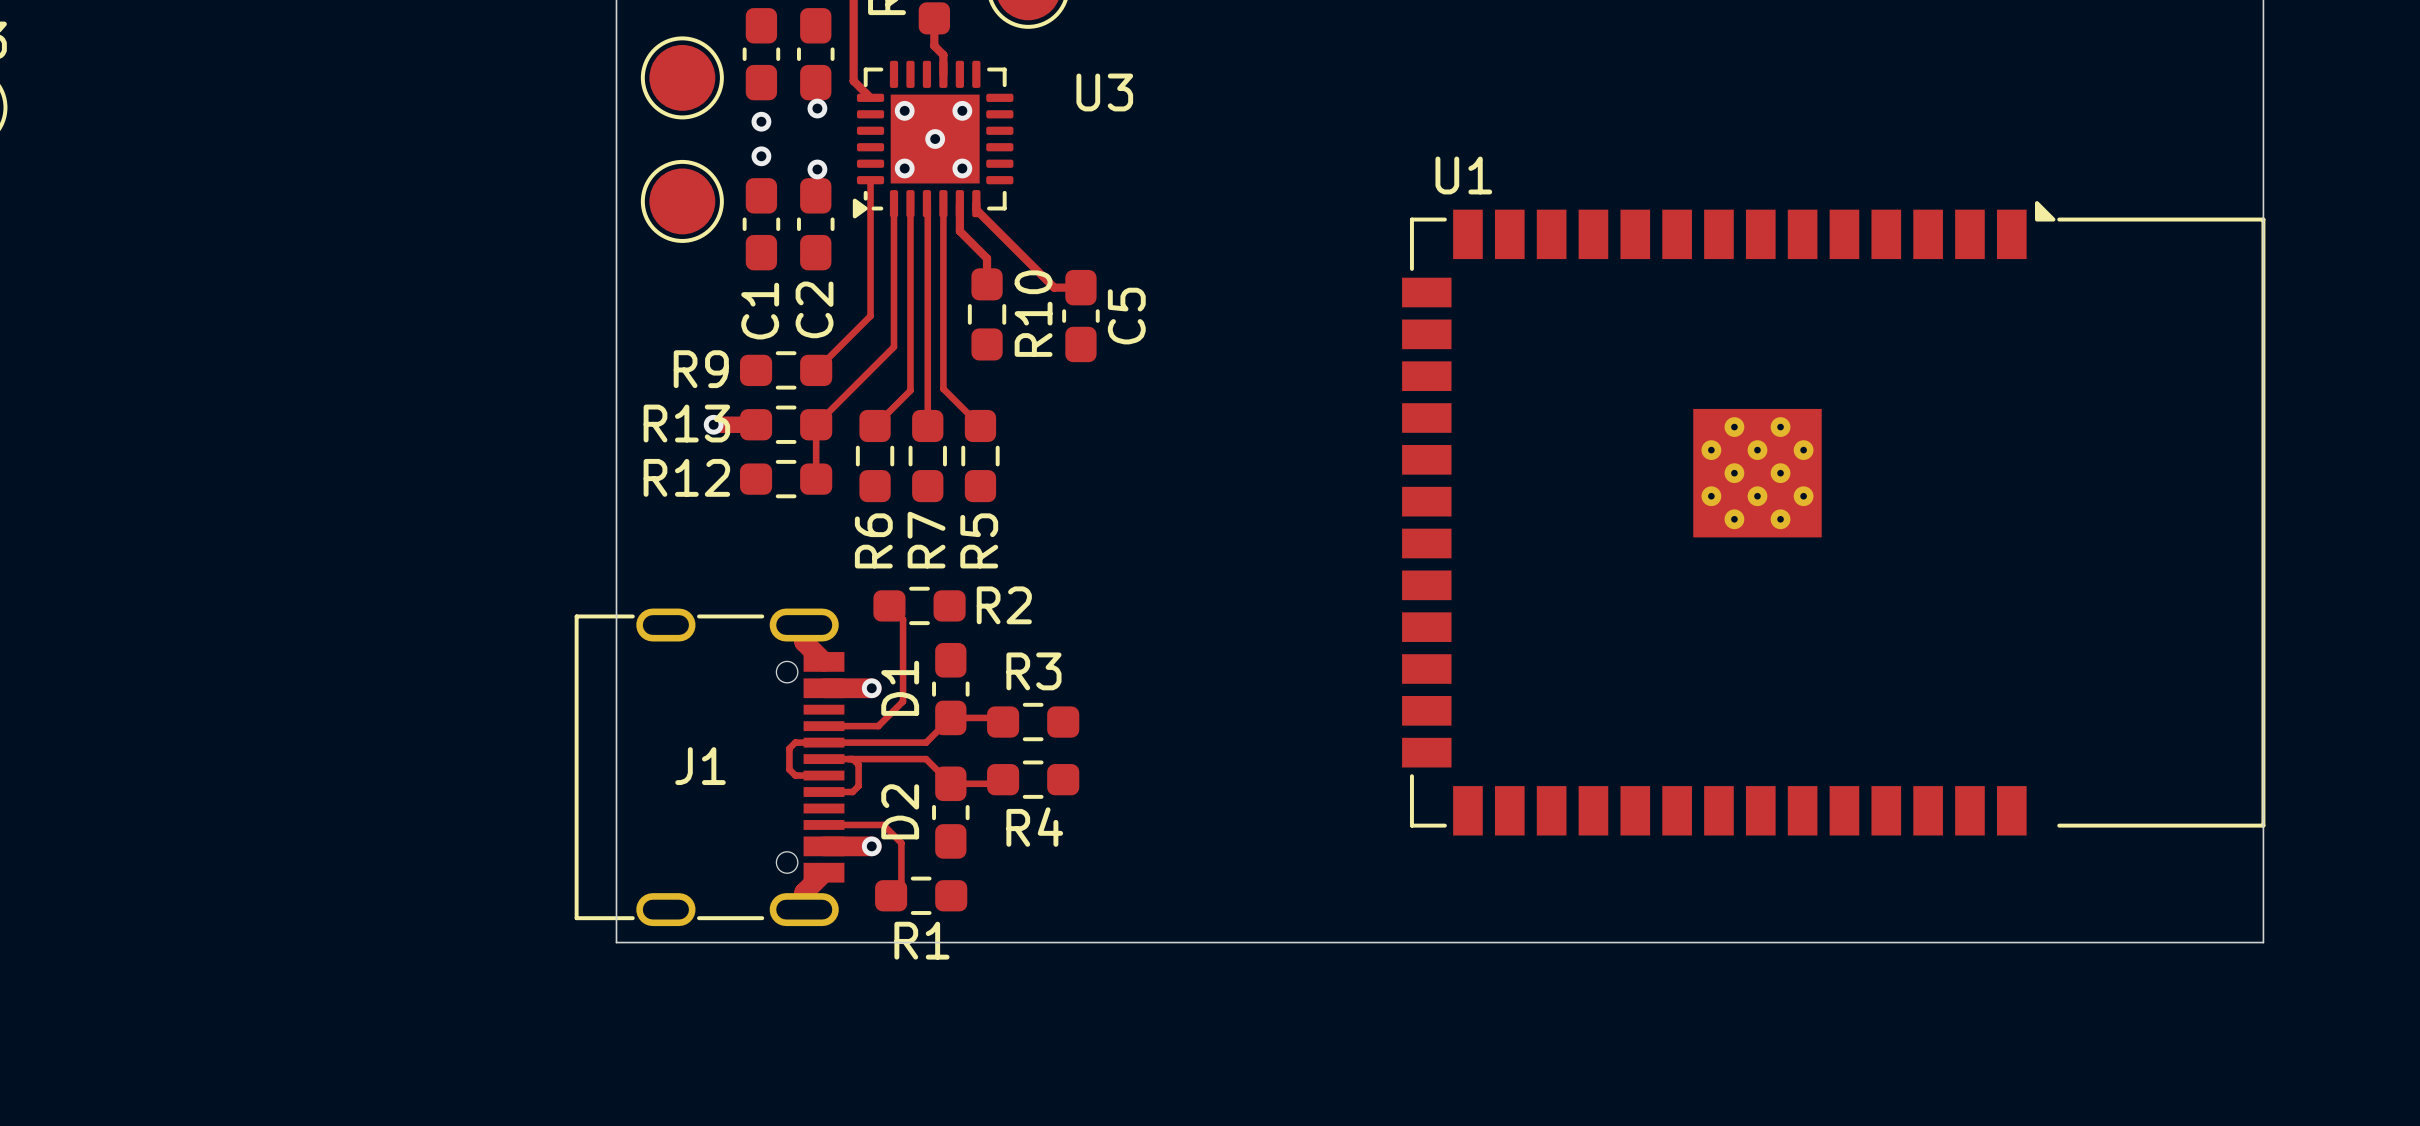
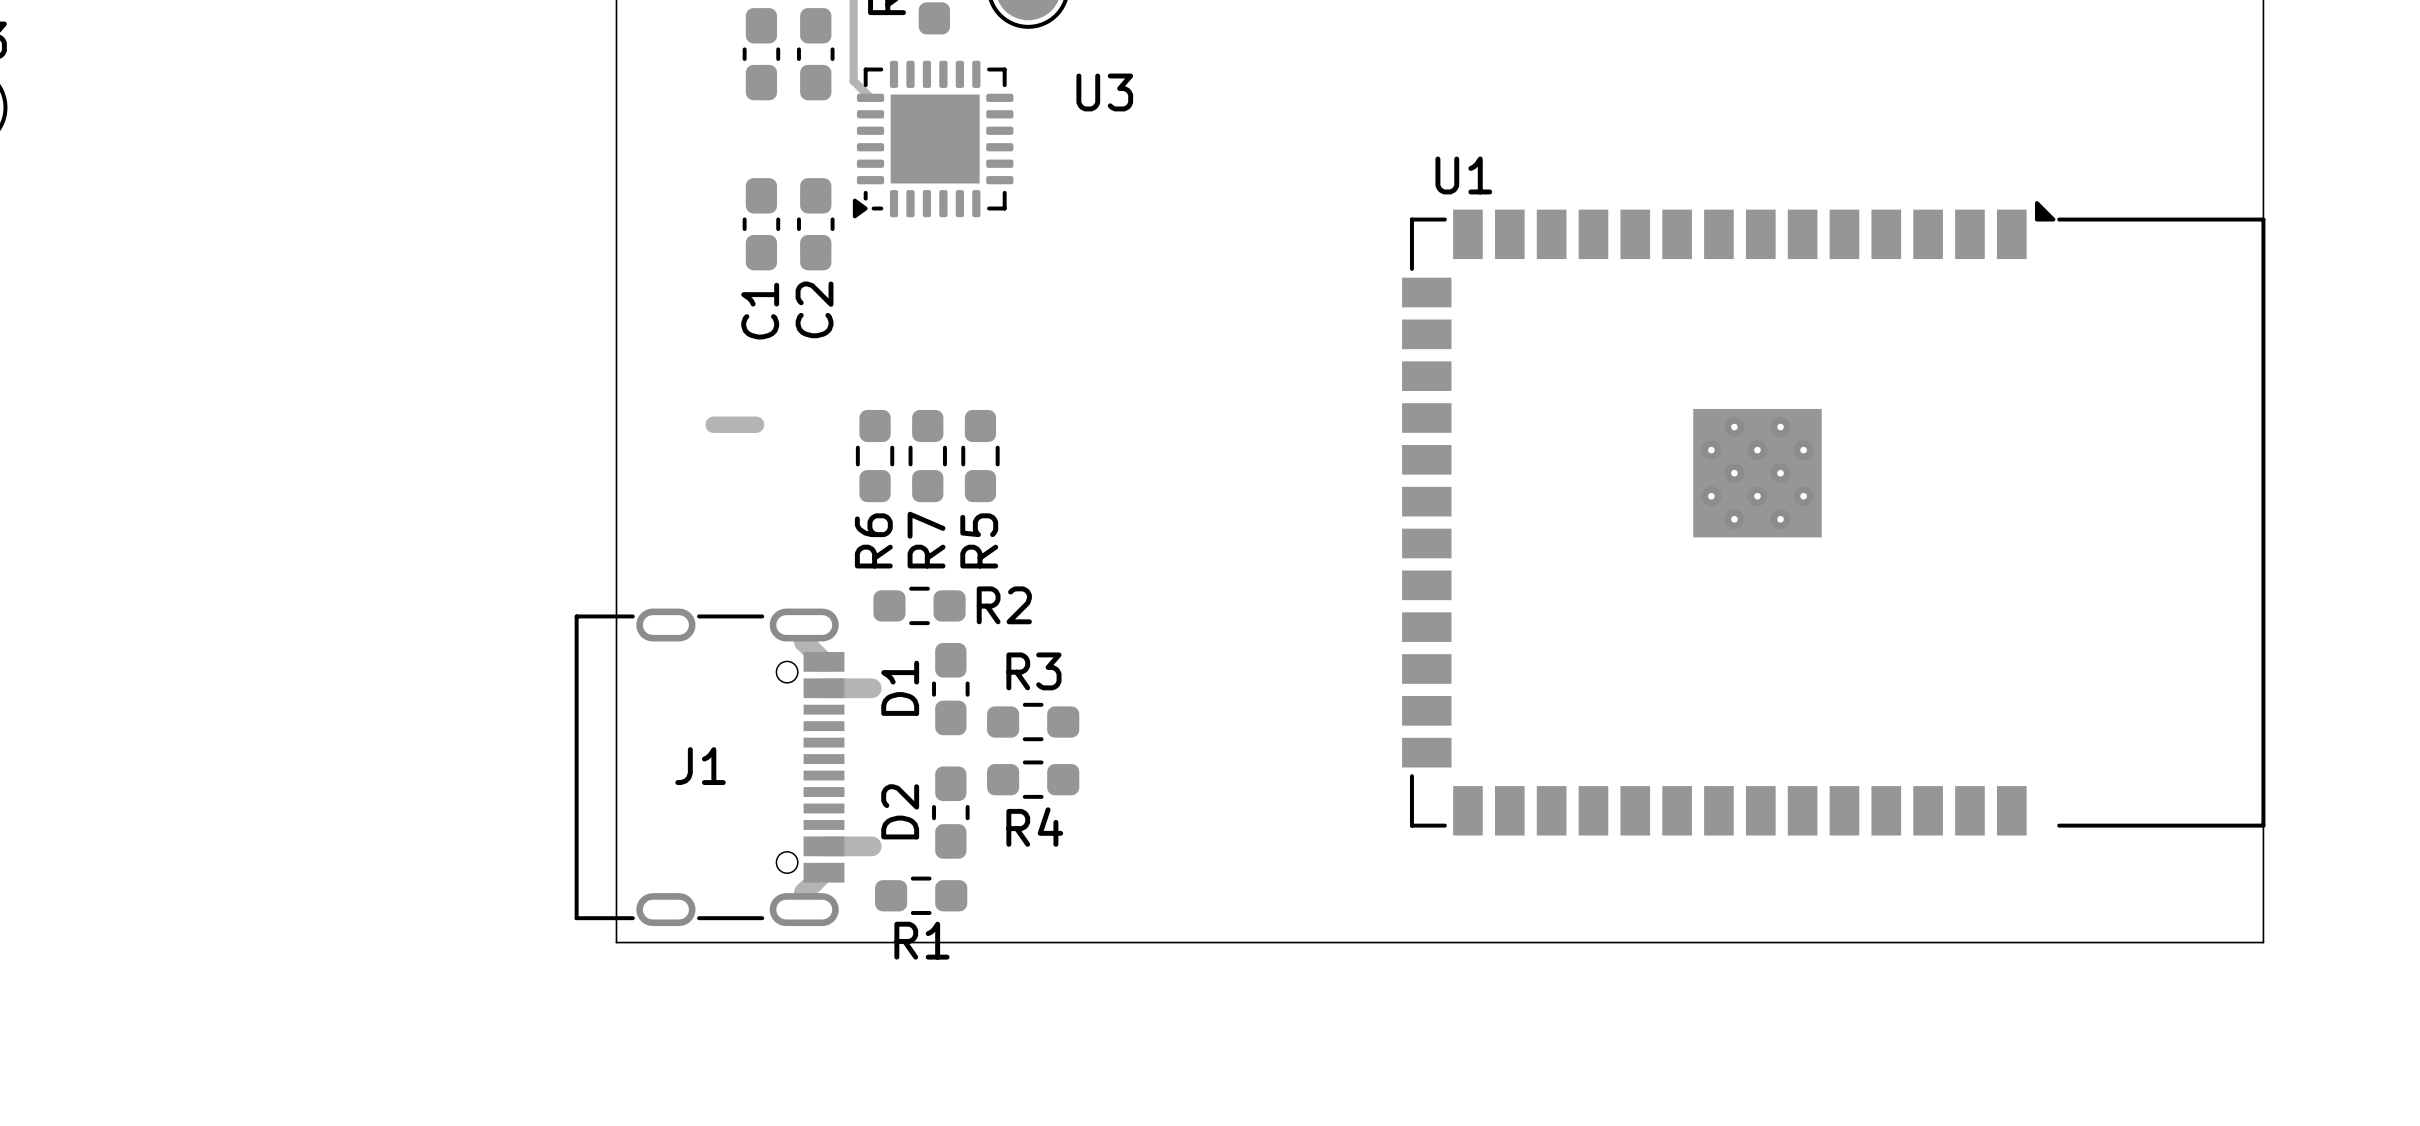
track: (934, 18) (934, 45) (943, 55) (943, 74) -> none
part: (682, 77) -> none
via: (817, 108) -> none
via: (904, 110) -> none
via: (962, 110) -> none
via: (761, 121) -> none
via: (935, 139) -> none
via: (761, 156) -> none
via: (904, 168) -> none
via: (962, 168) -> none
via: (817, 169) -> none
track: (870, 180) (870, 316) (816, 370) -> none
part: (682, 201) -> none
track: (894, 203) (894, 346) (816, 424) (816, 479) -> none
track: (910, 203) (910, 390) (875, 425) -> none
track: (926, 203) (927, 425) -> none
track: (943, 203) (943, 388) (980, 425) -> none
track: (959, 203) (959, 231) (987, 258) (987, 284) -> none
track: (976, 203) (976, 209) (1054, 287) (1080, 287) -> none
R10: (987, 314) -> none
C5: (1080, 316) -> none
R9: (786, 370) -> none
via: (713, 424) -> none
R13: (786, 424) -> none
R12: (786, 479) -> none
track: (889, 605) (903, 619) (903, 701) (878, 726) (824, 726) -> none
via: (871, 688) -> none
track: (1003, 722) (998, 717) (950, 717) (926, 742) (795, 742) (789, 748) (789, 769) (795, 775) (824, 775) -> none
track: (824, 759) (926, 759) (950, 783) (998, 783) (1003, 779) -> none
track: (852, 759) (858, 764) (858, 786) (852, 792) (824, 792) -> none
track: (824, 824) (883, 824) (901, 843) (901, 885) (891, 895) -> none
via: (871, 846) -> none

